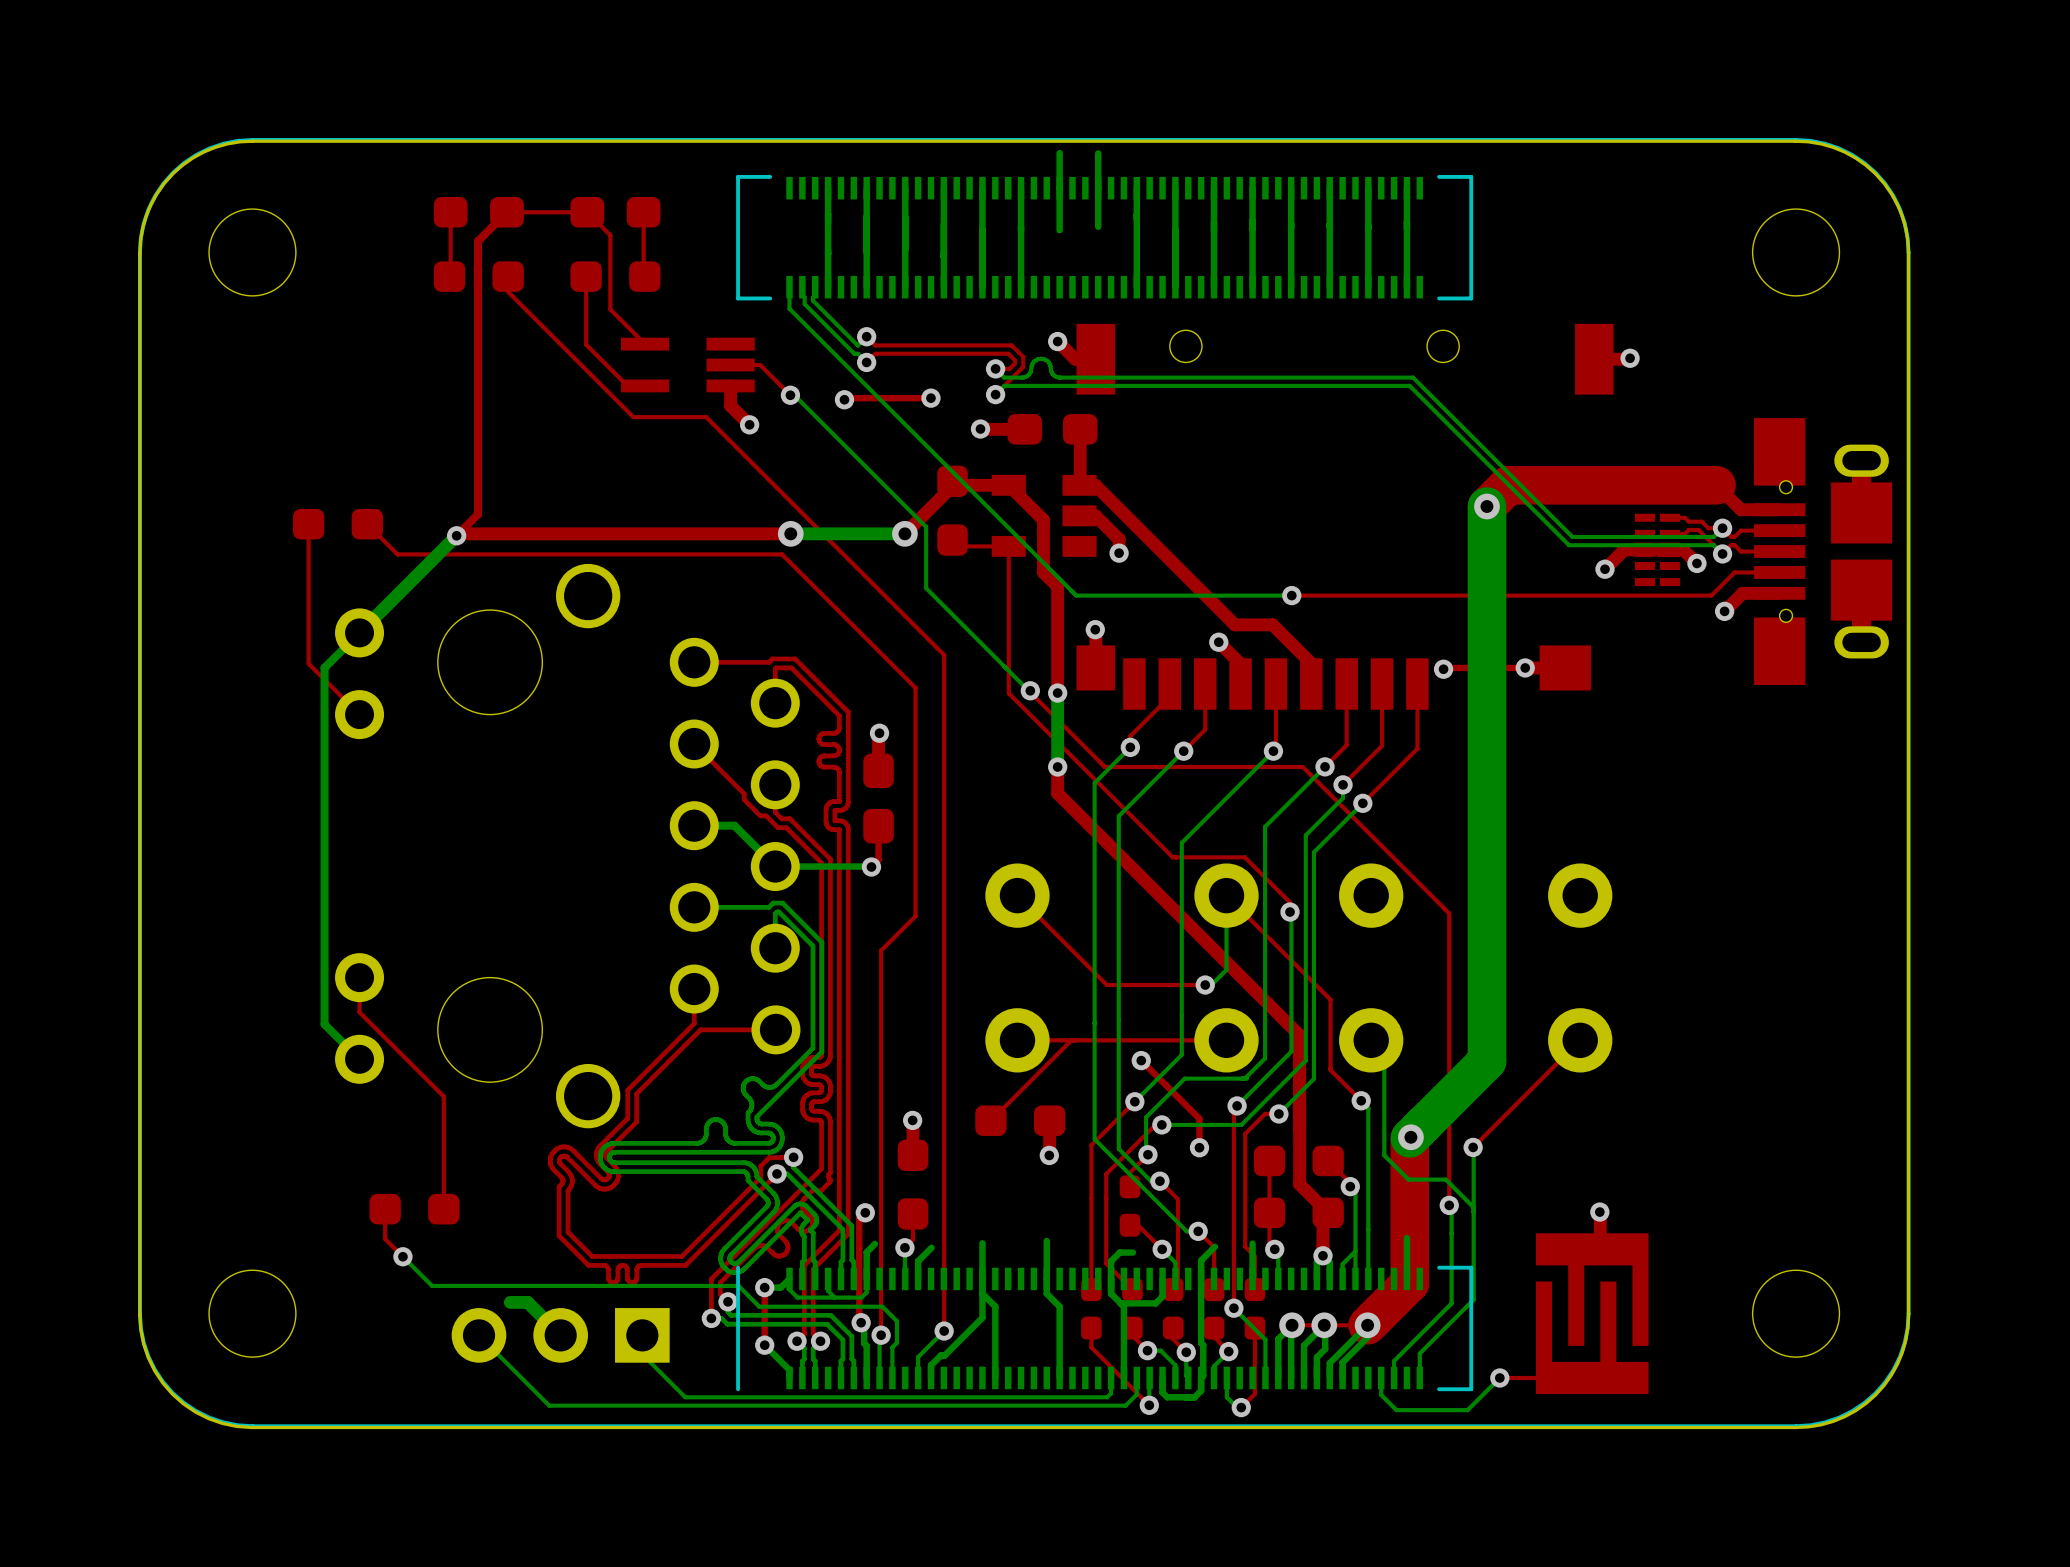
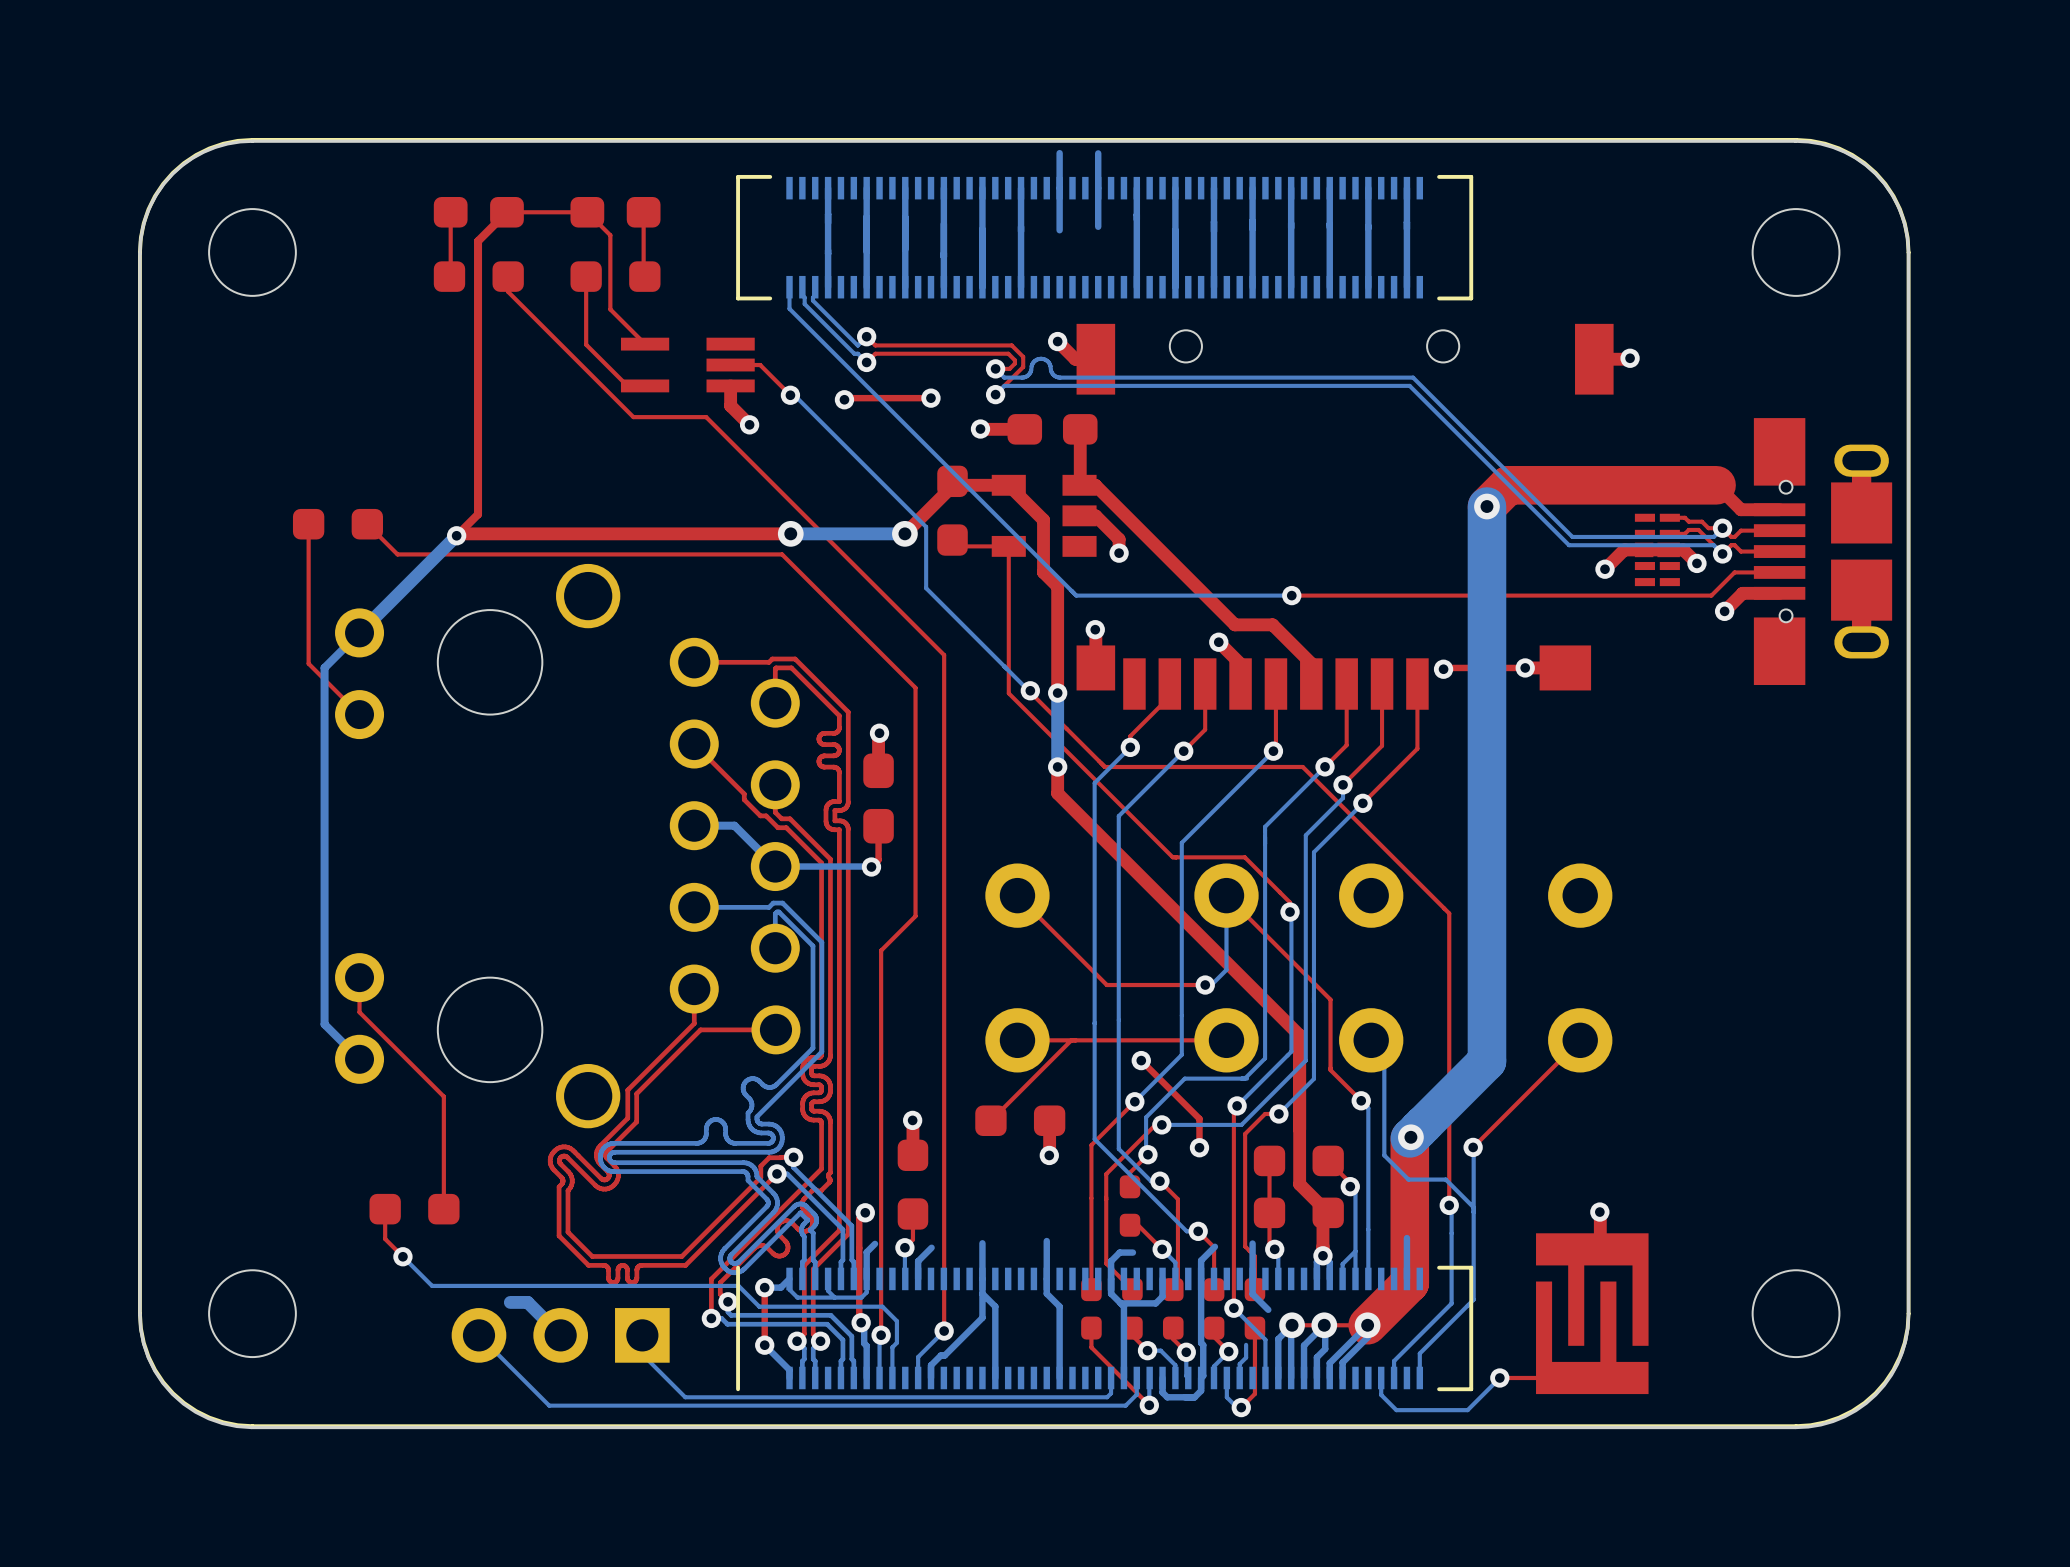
bottom track: none -> (1252, 1278) (1252, 1294) (1268, 1309)
bottom track: none -> (1246, 1344) (1246, 1357) (1239, 1364) (1239, 1377)

